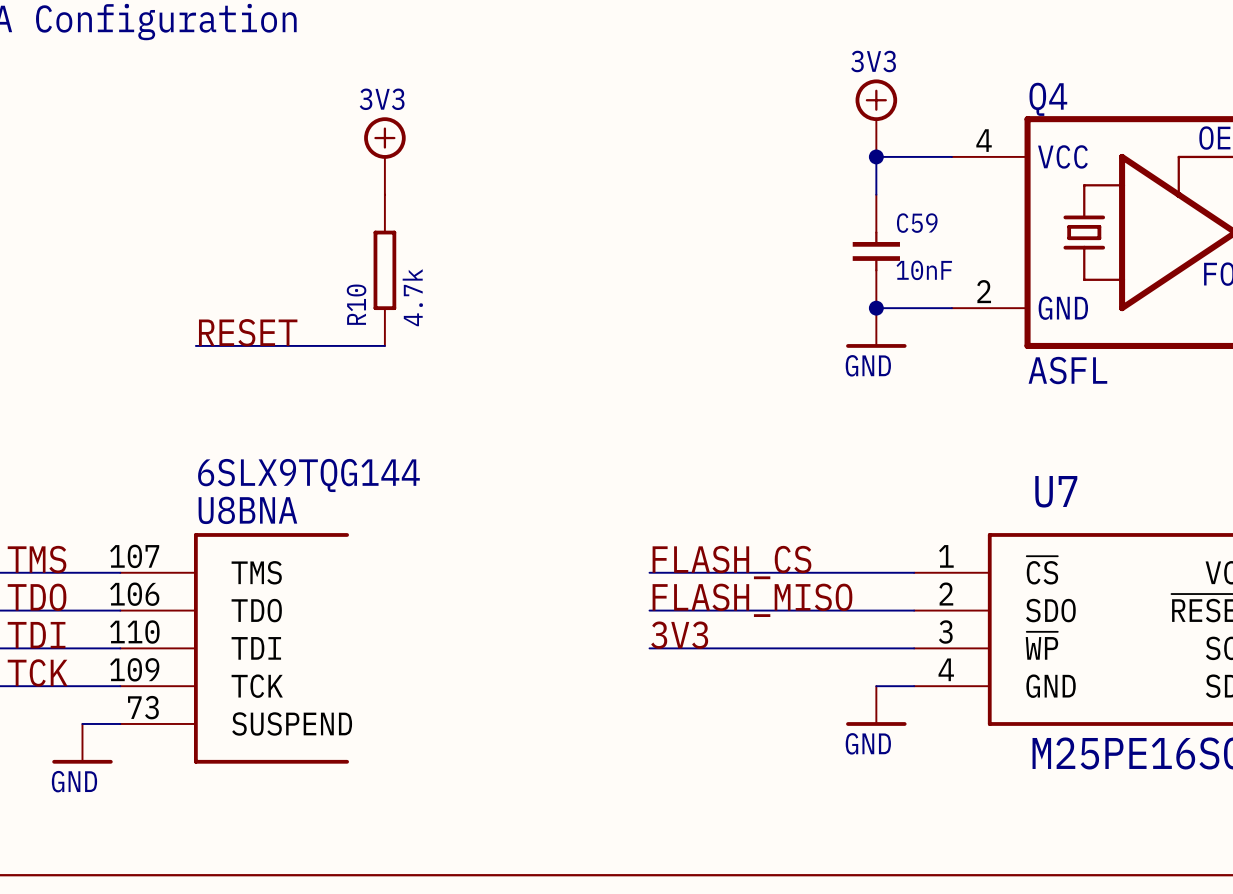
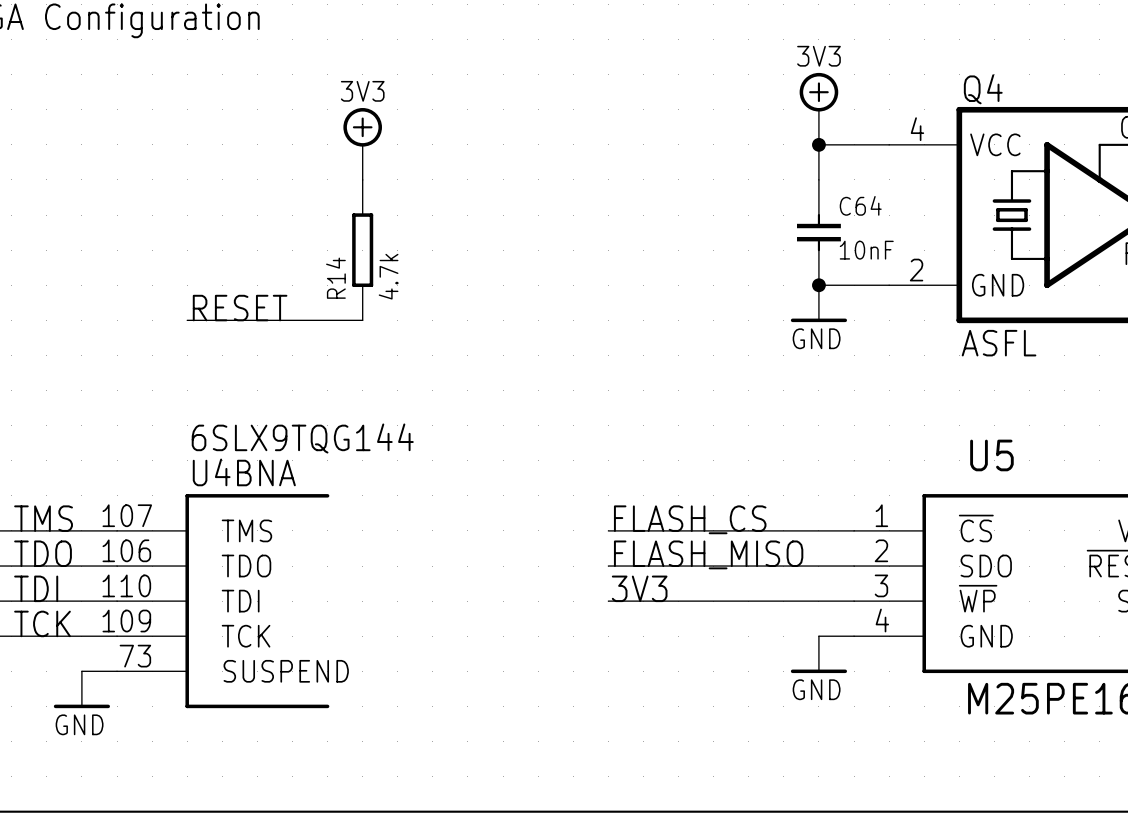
C59 name: C59 (917, 223) -> C64 (860, 205)
R10 name: R10 (356, 304) -> R14 (335, 278)
U7 name: U7 (1056, 491) -> U5 (991, 455)
U8BNA name: U8BNA (247, 510) -> U4BNA (244, 472)

